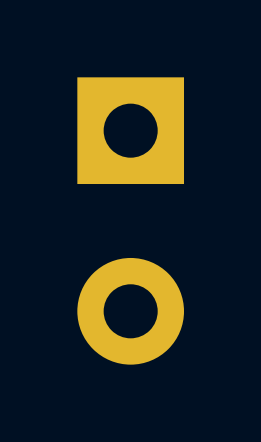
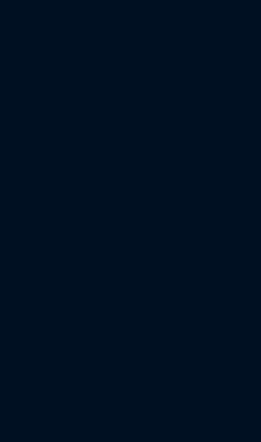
part: (130, 220) -> none

